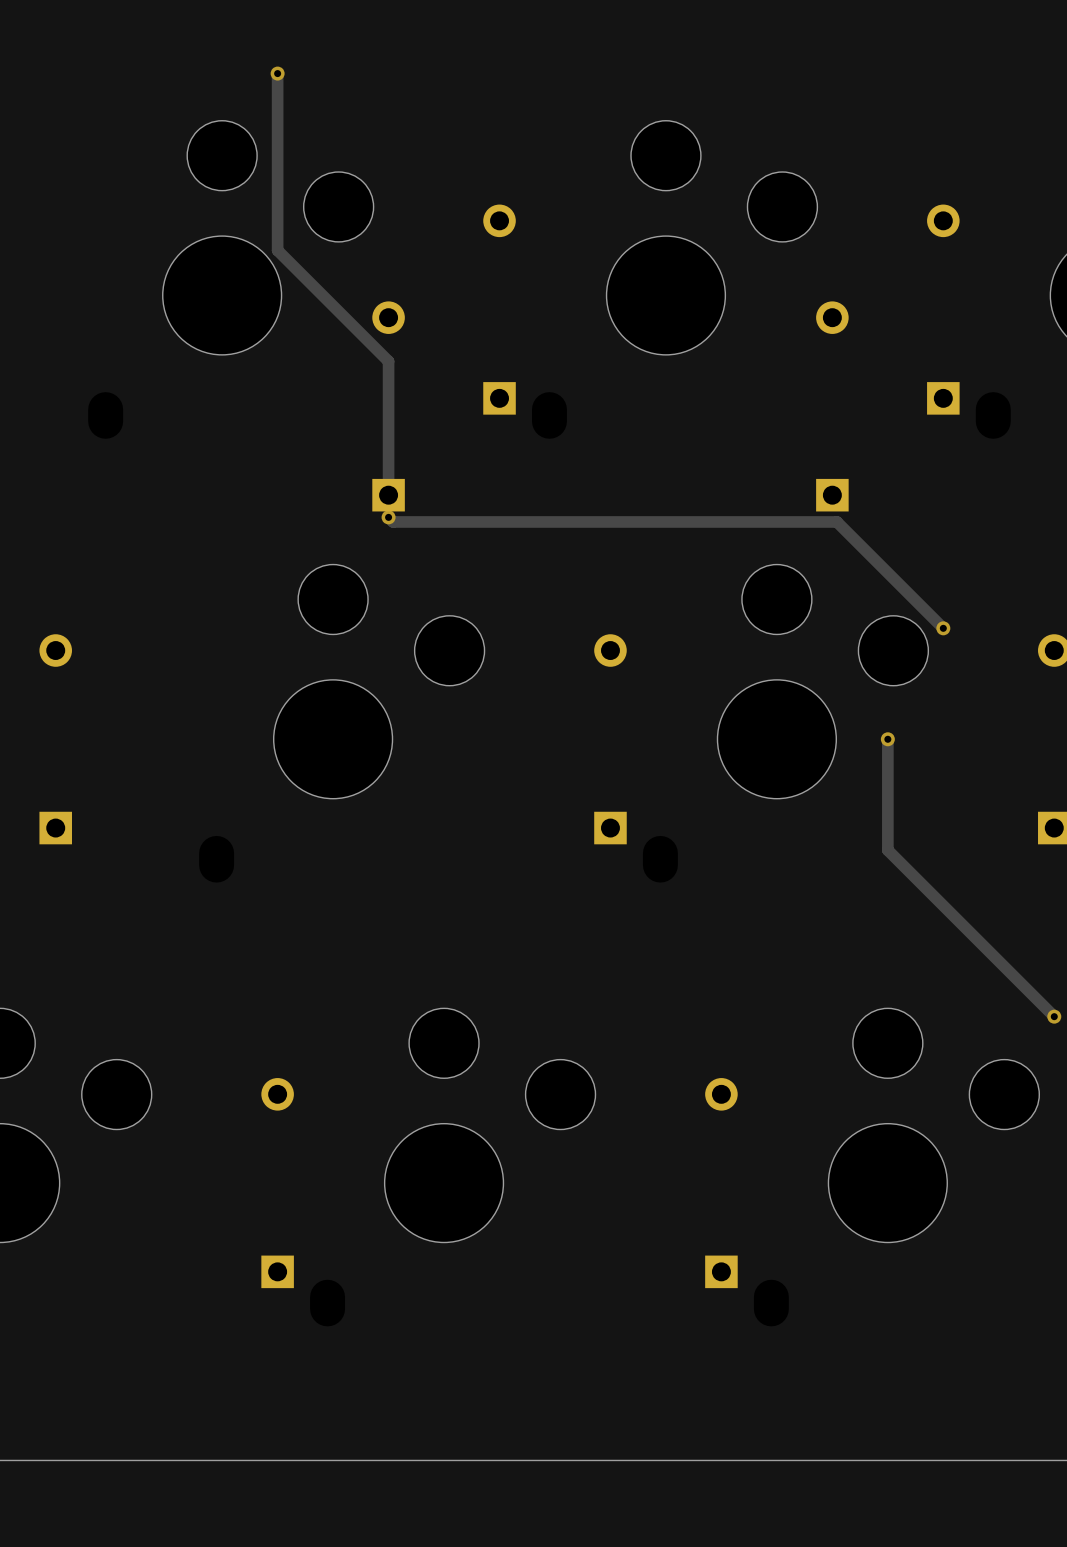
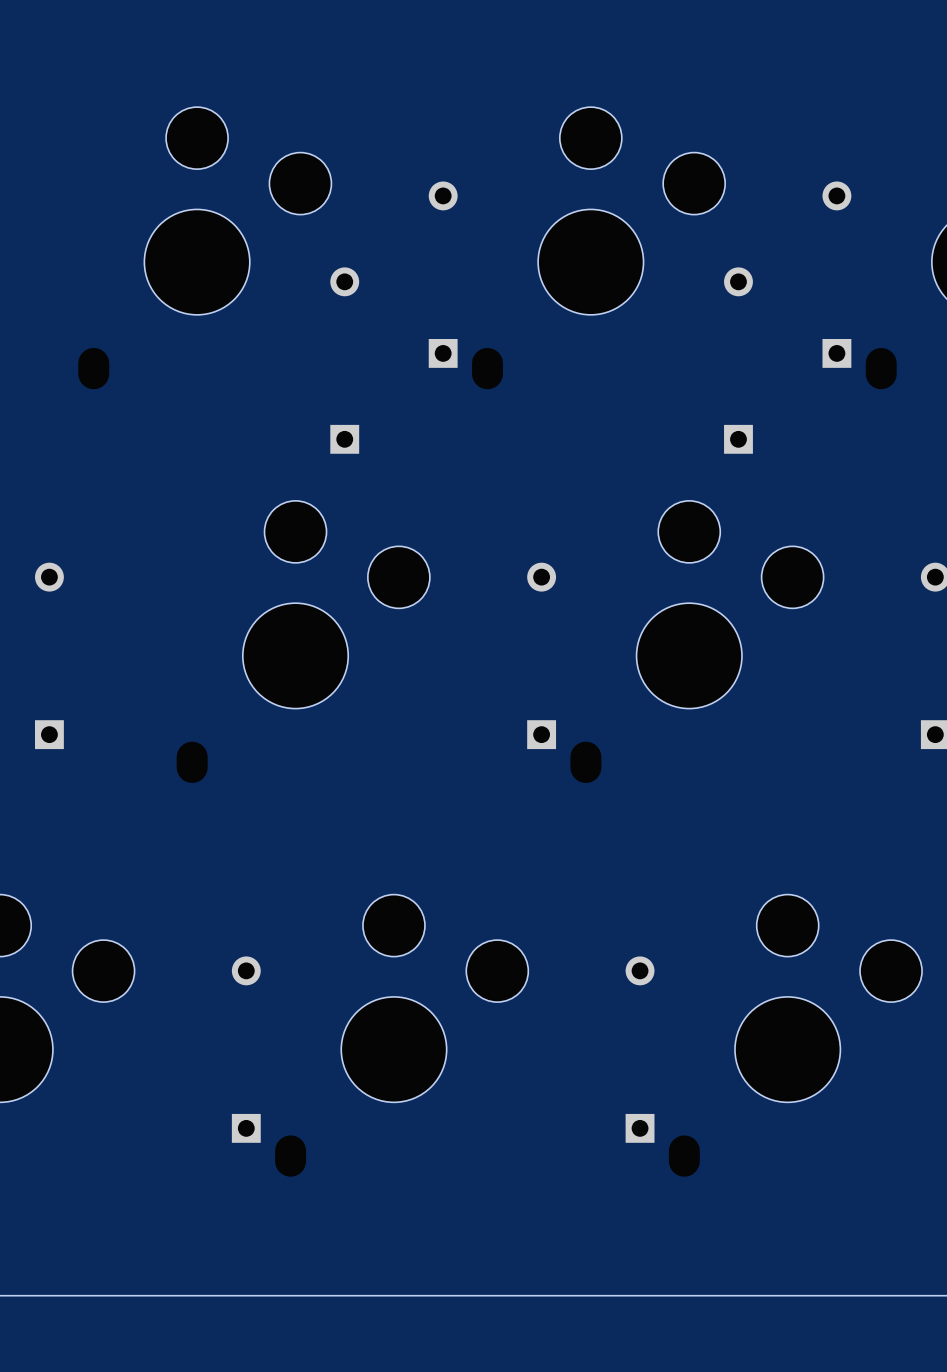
track: (277, 73) (277, 250) (388, 361) (388, 495) -> none
via: (277, 73) -> none
track: (388, 517) (393, 521) (836, 521) (943, 628) -> none
via: (388, 517) -> none
via: (943, 628) -> none
track: (887, 739) (887, 850) (1054, 1016) -> none
via: (887, 739) -> none
via: (1054, 1016) -> none

